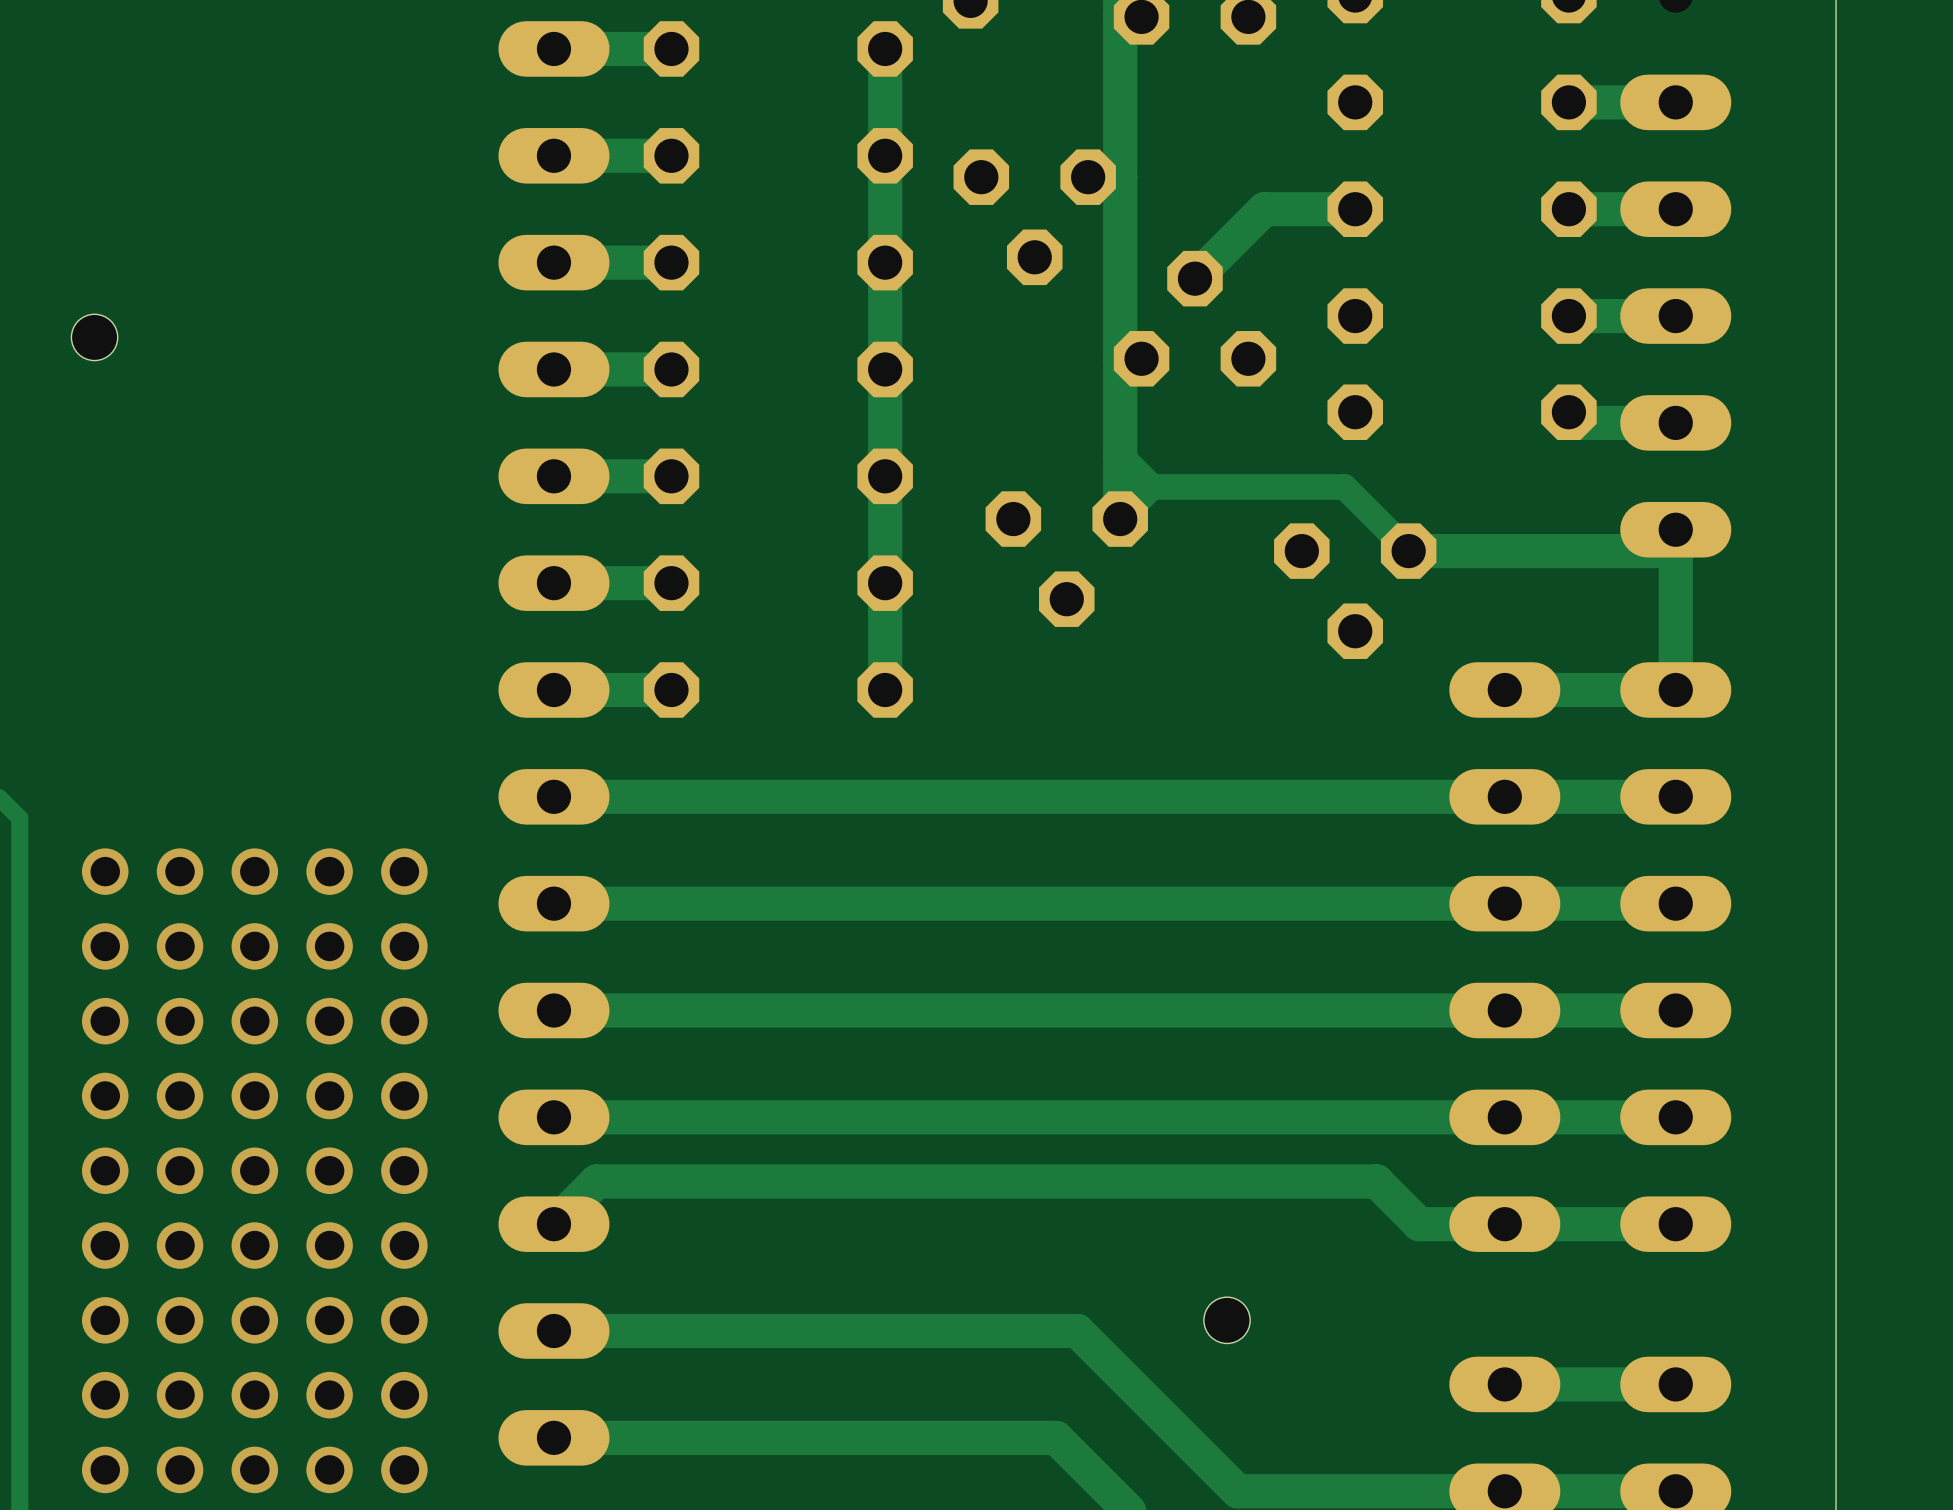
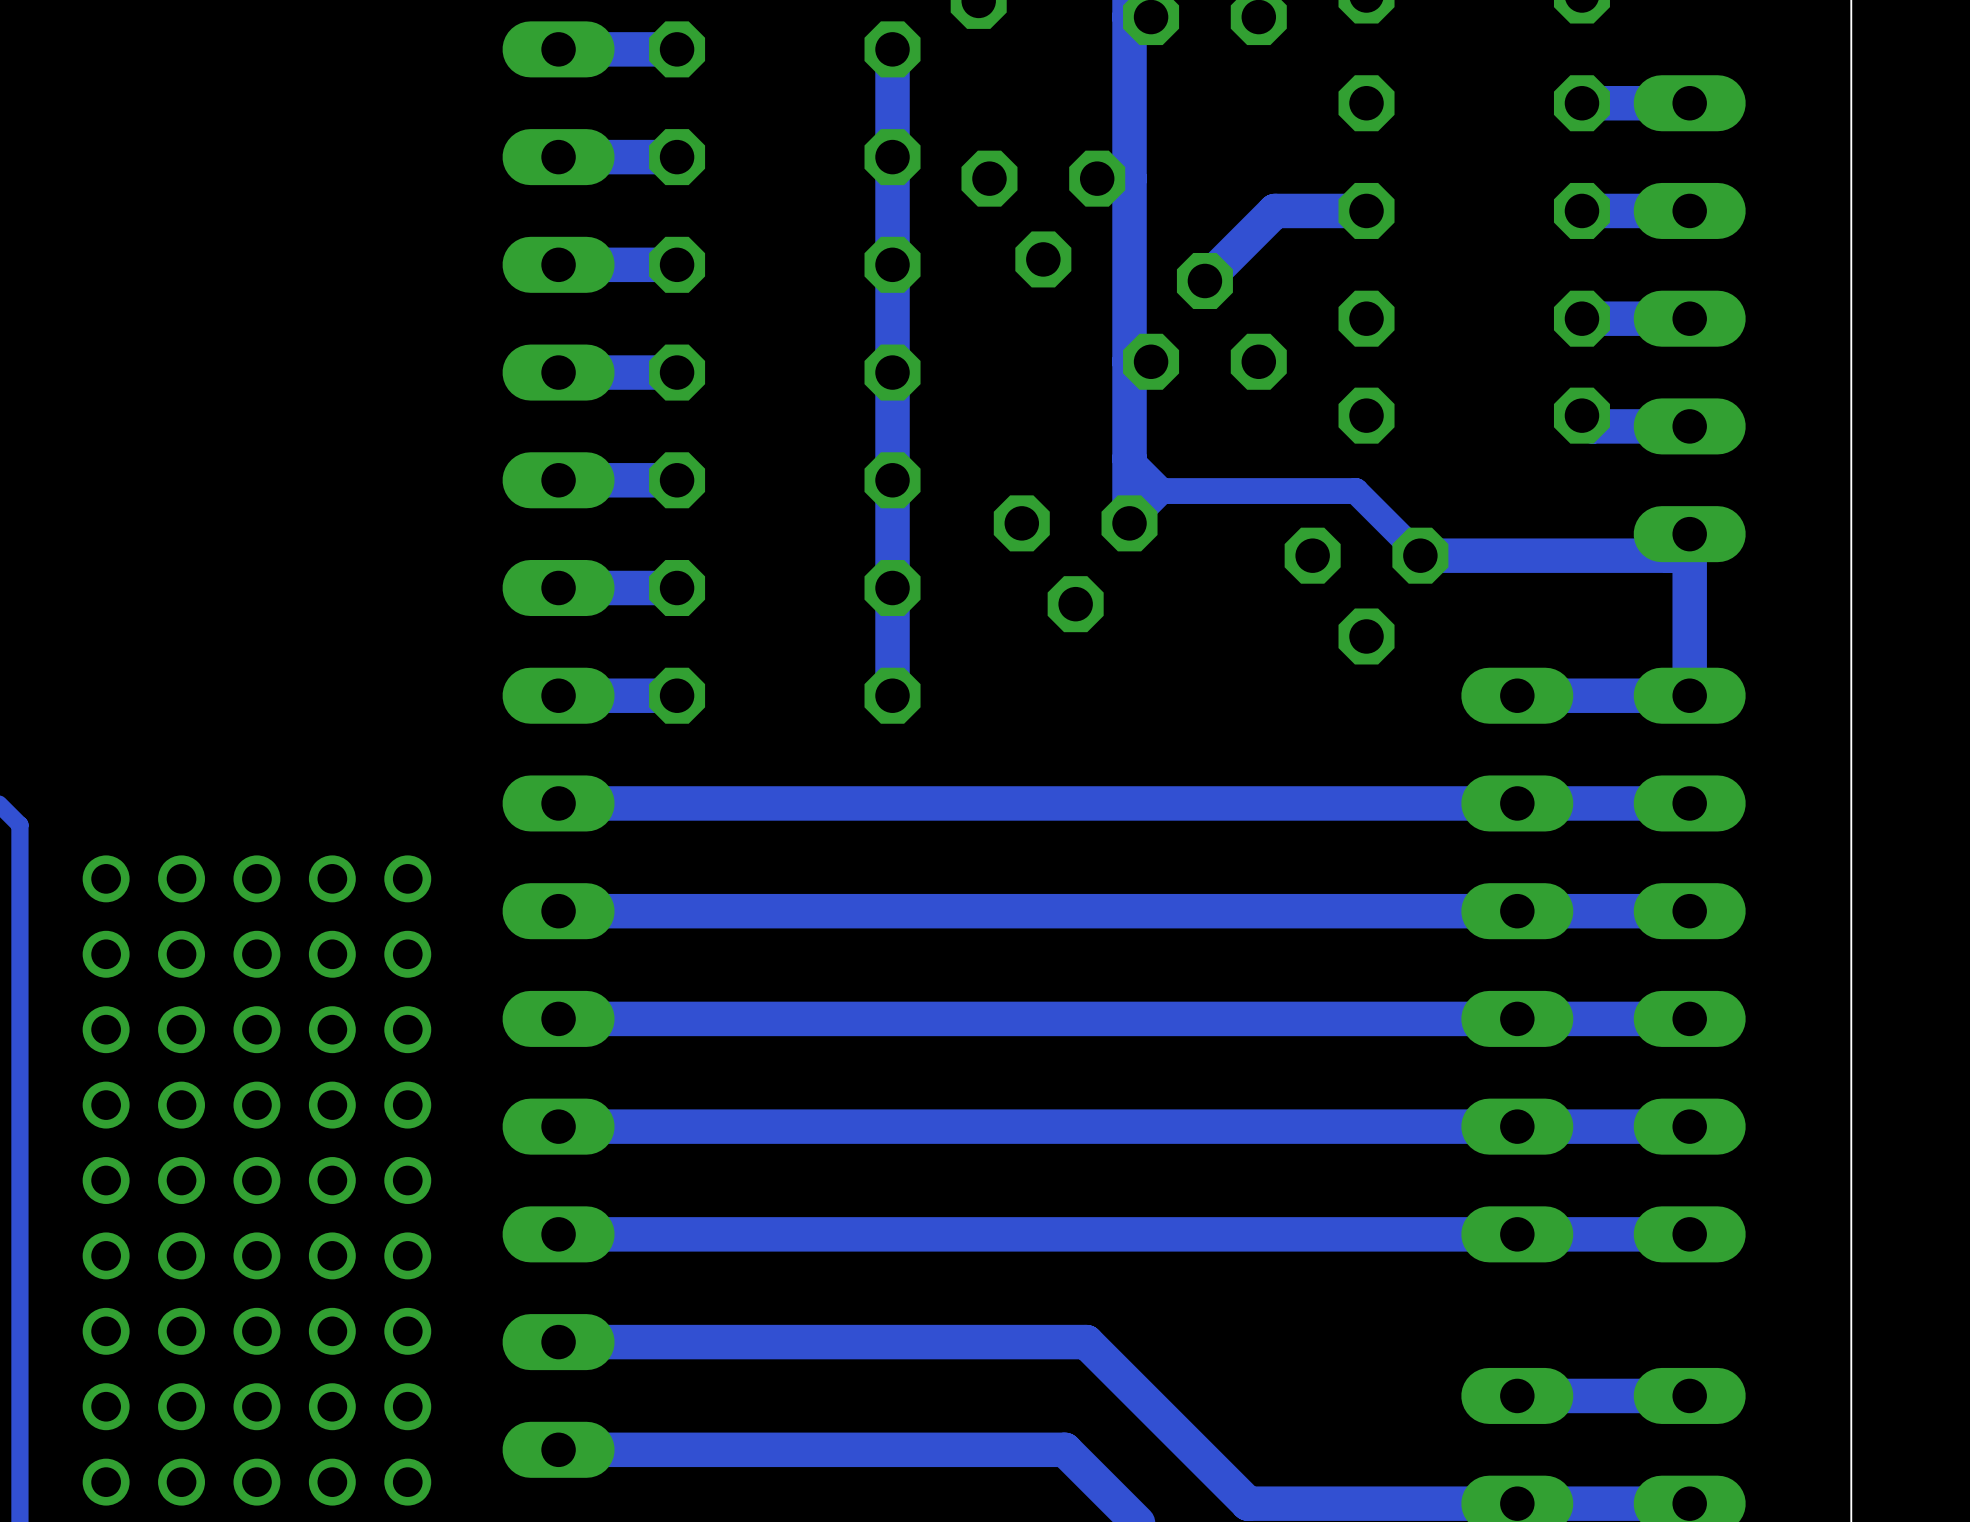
hole: (94, 337) -> none
track: (1419, 1224) (1376, 1181) (596, 1181) (553, 1224) -> (1431, 1234) (558, 1234)
hole: (1227, 1320) -> none

